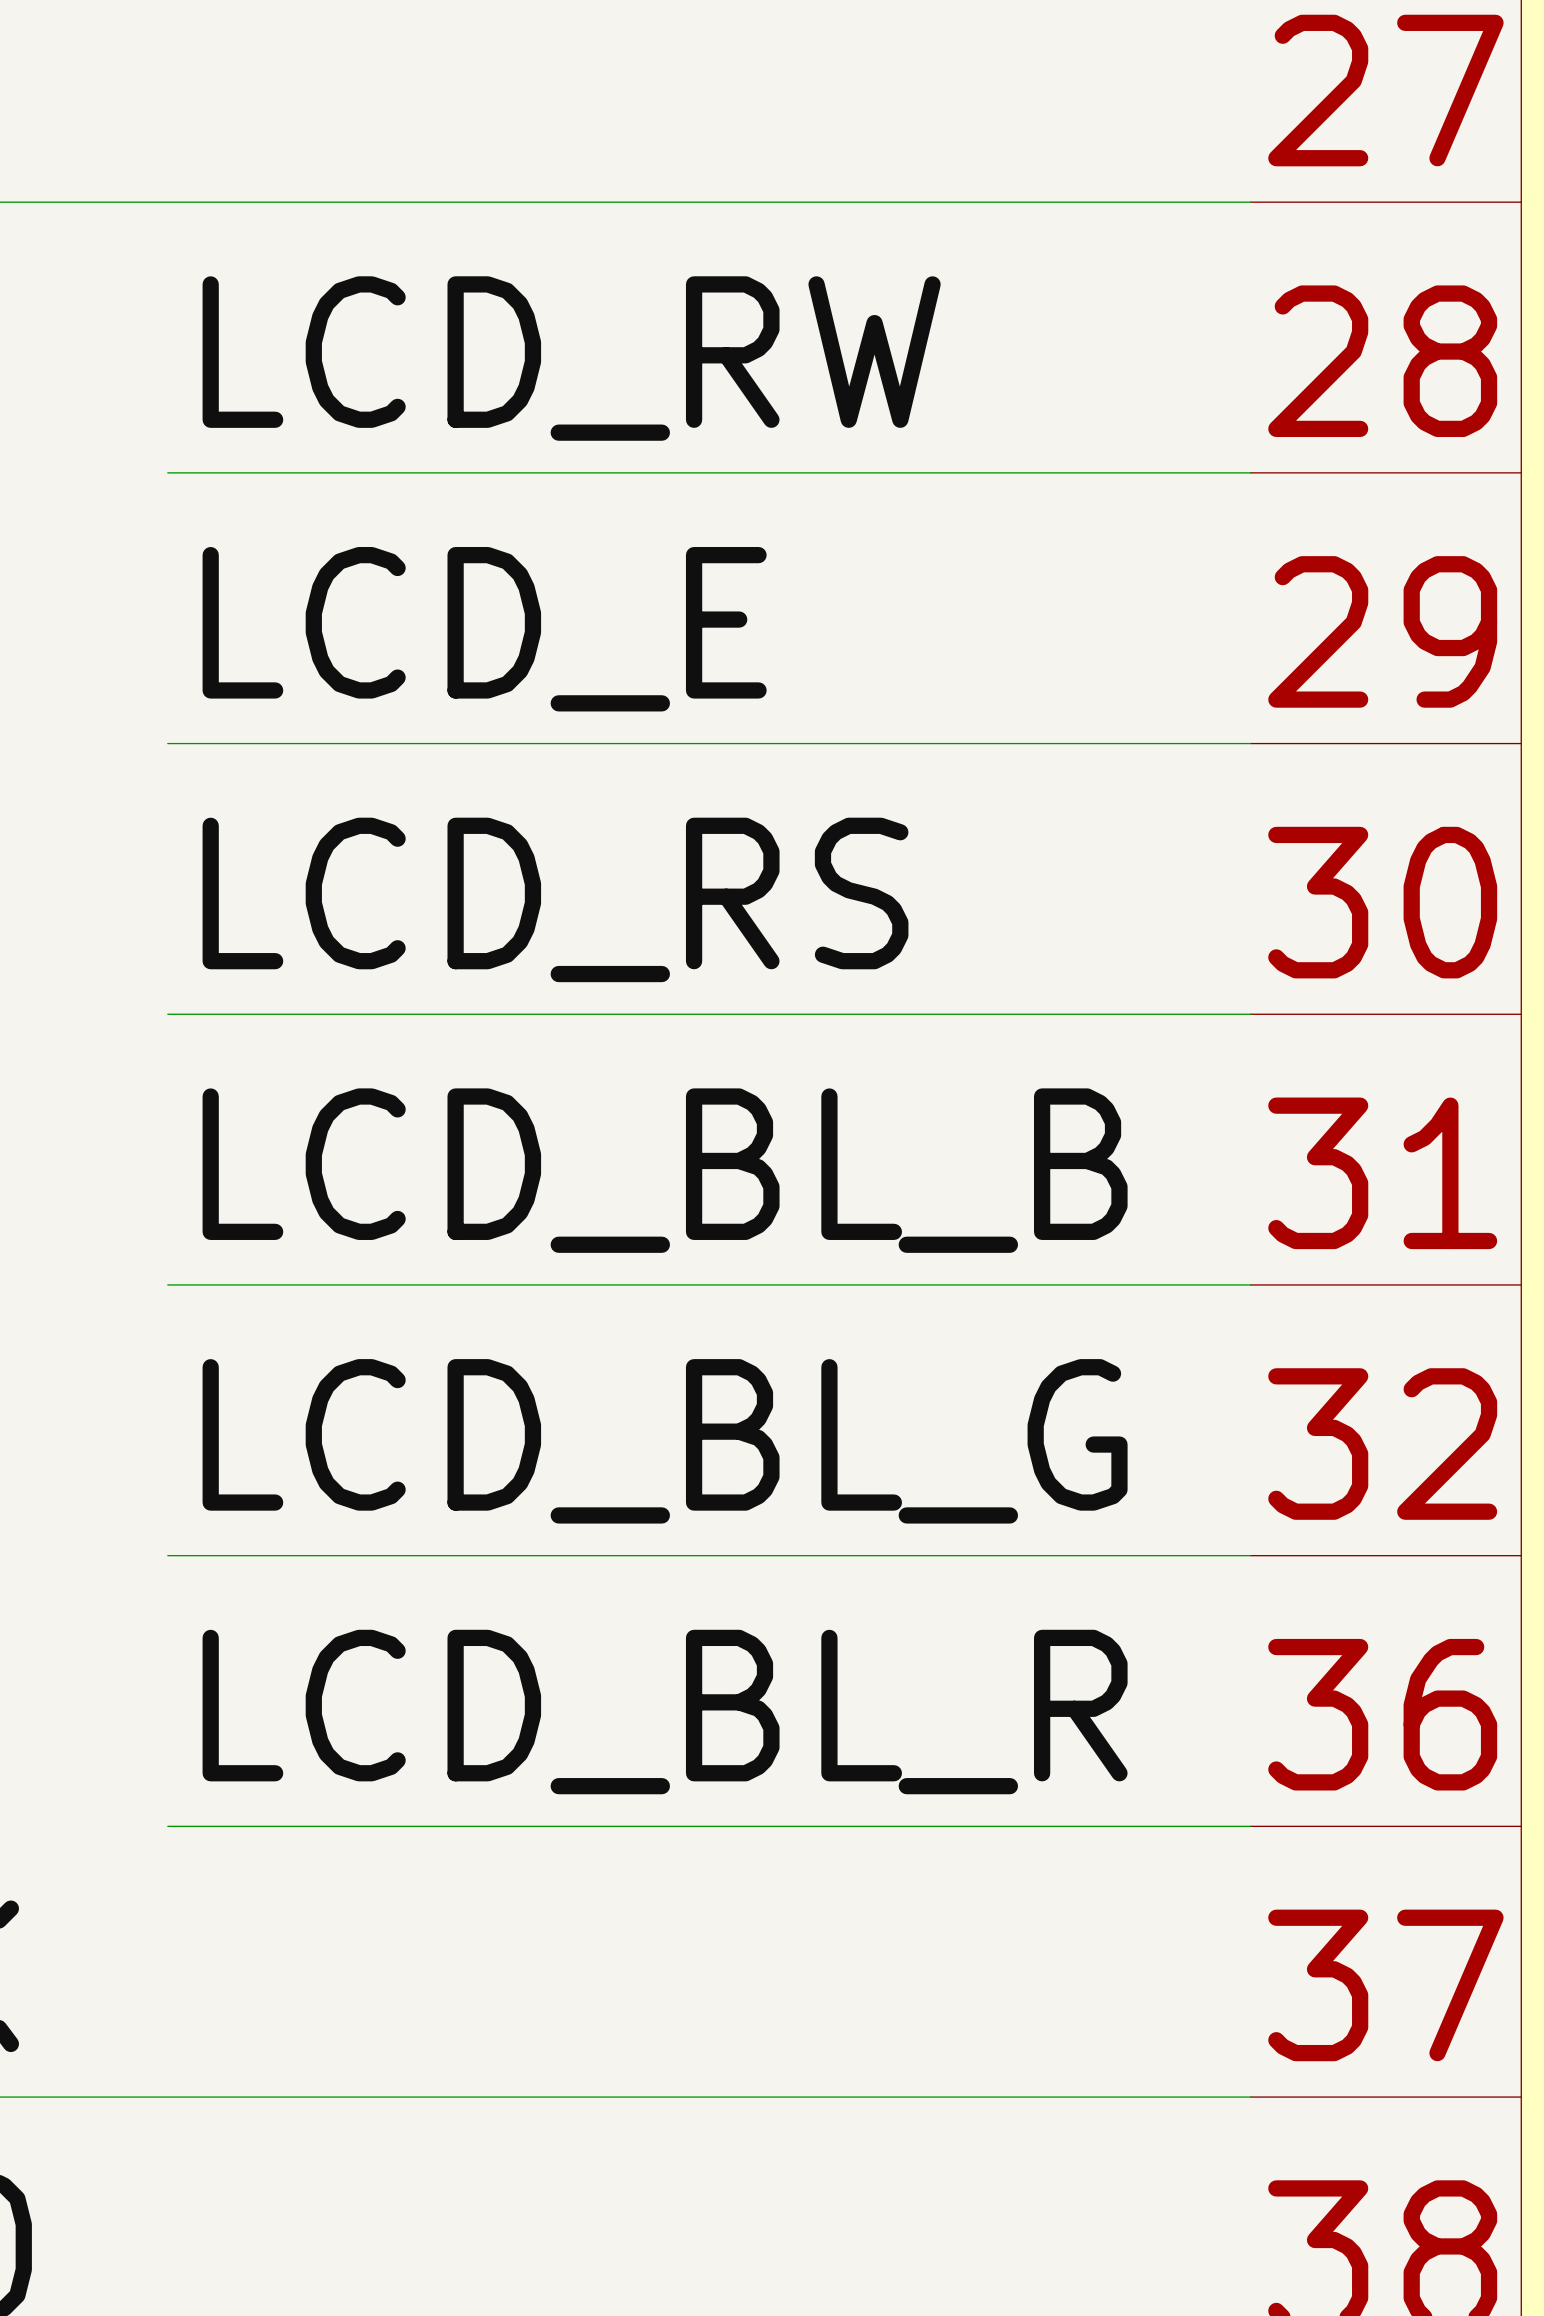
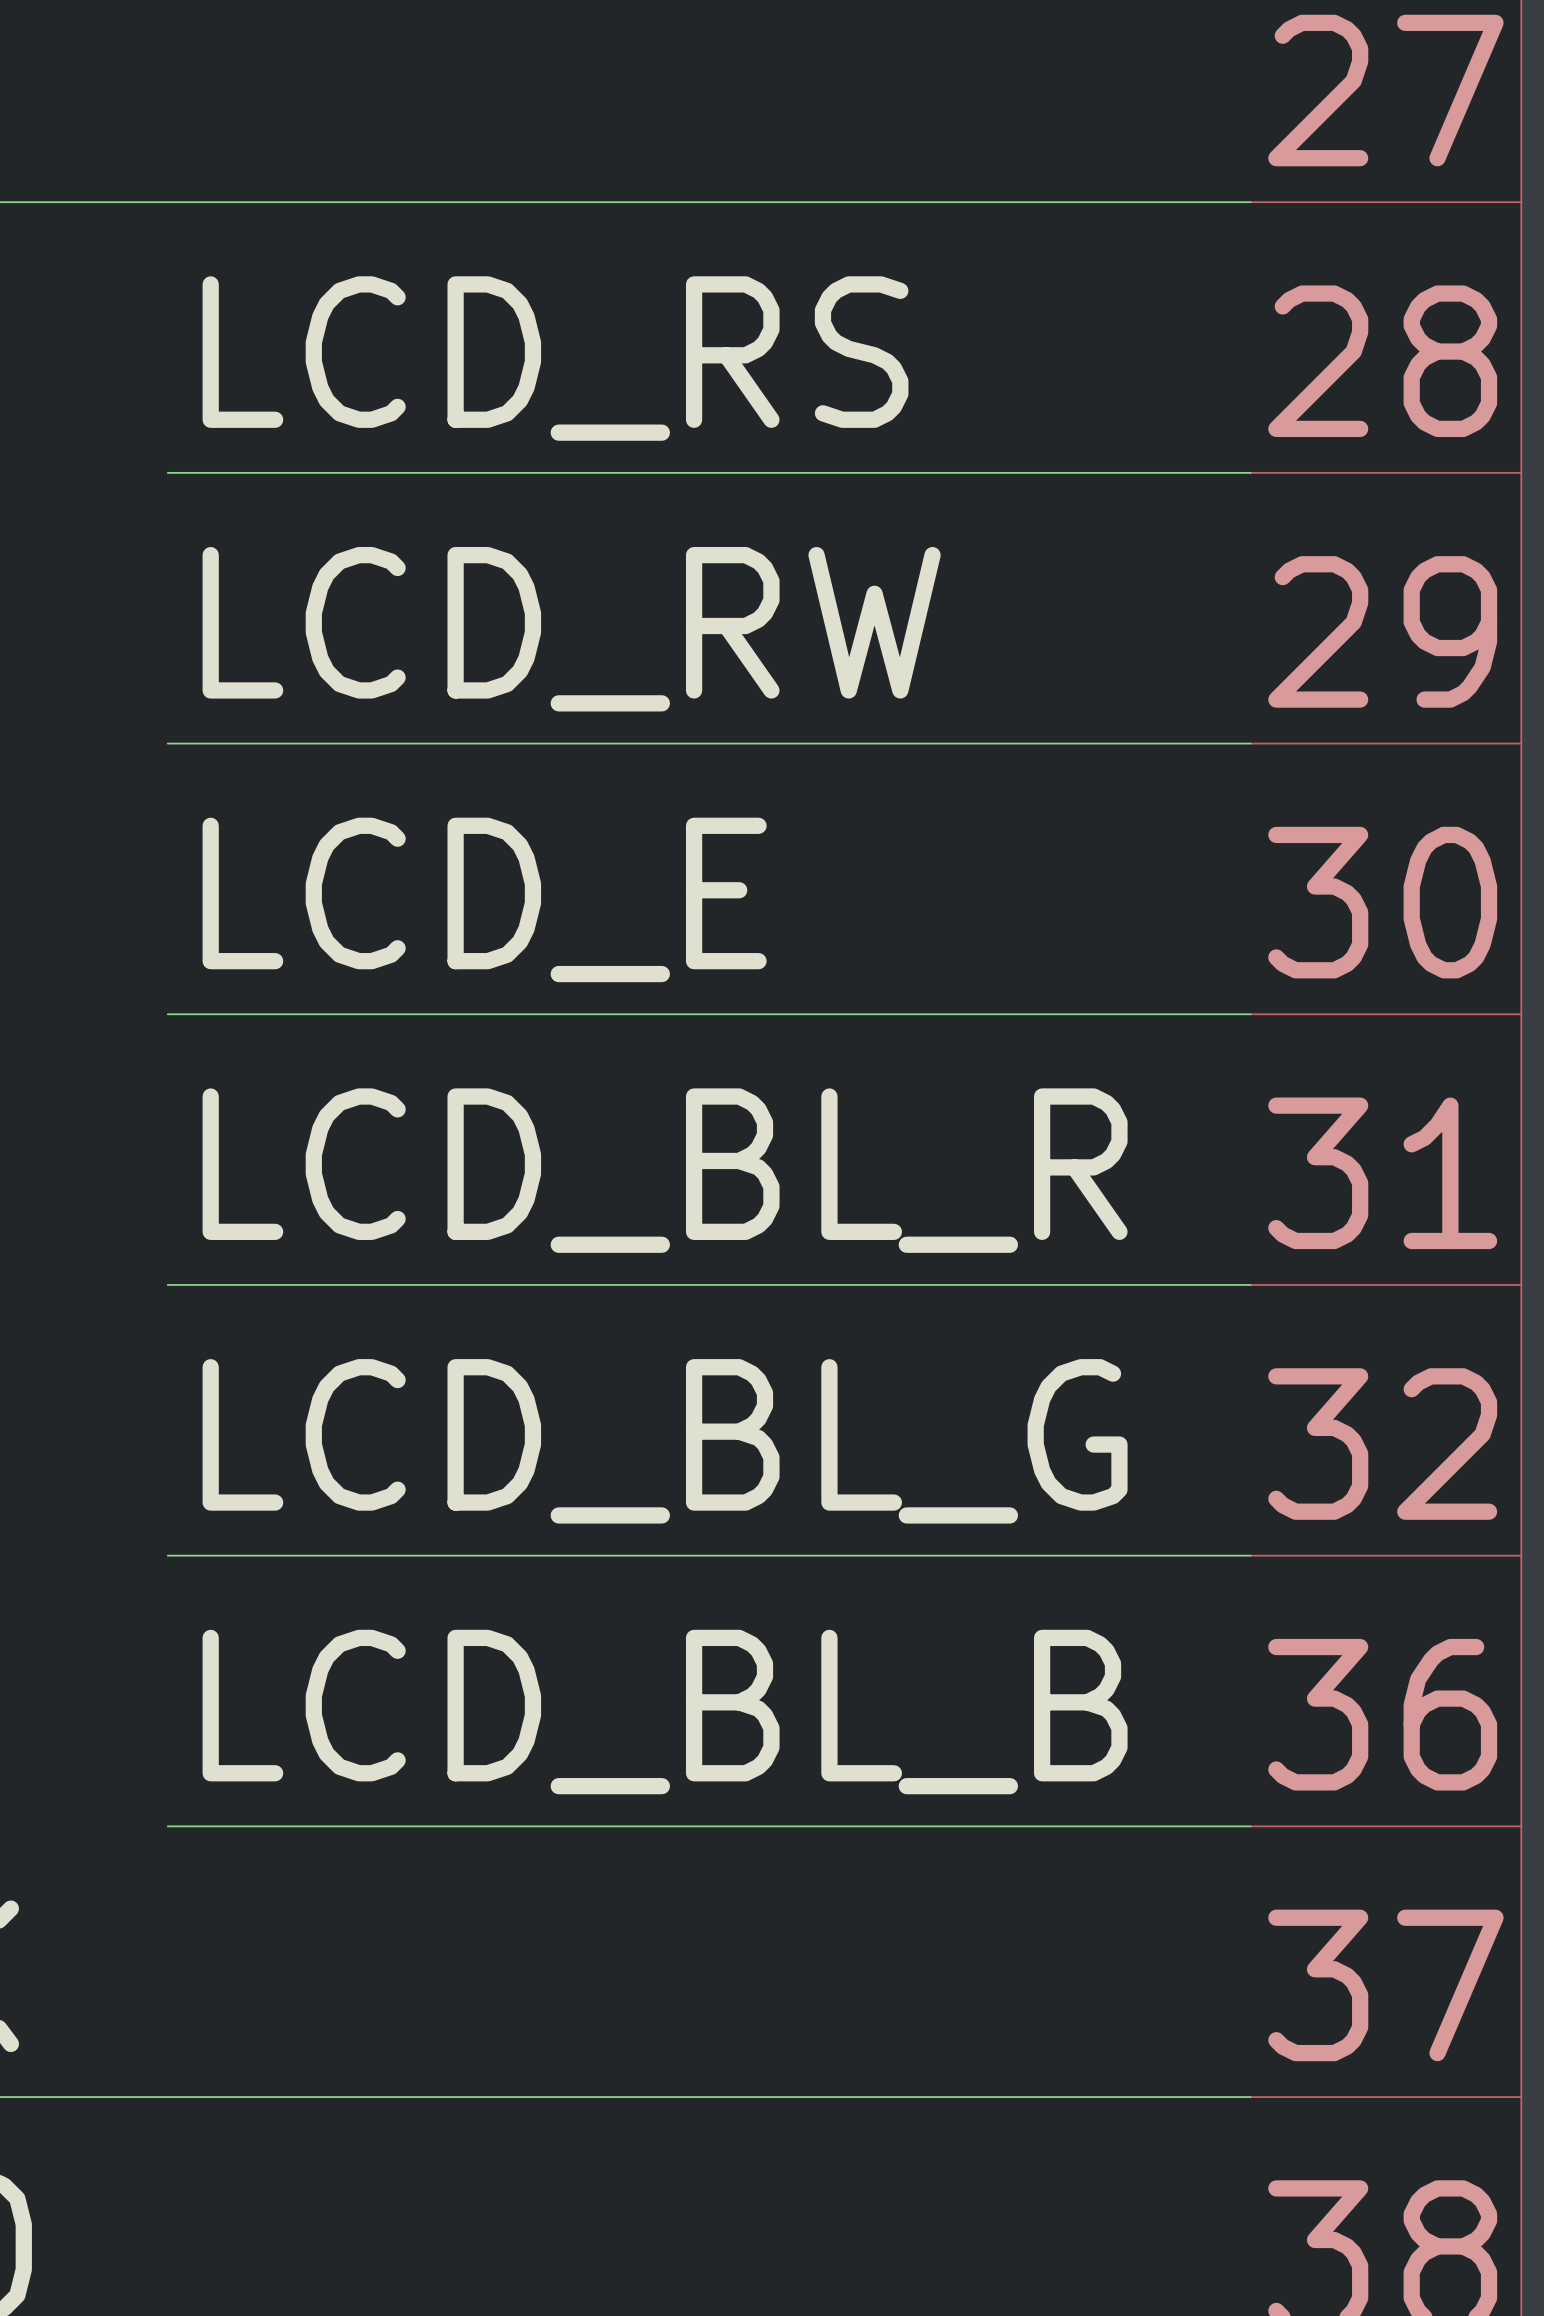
label: LCD_RW (571, 358) -> LCD_RS (555, 358)
label: LCD_E (484, 629) -> LCD_RW (571, 629)
label: LCD_RS (555, 899) -> LCD_E (484, 899)
label: LCD_BL_B (665, 1170) -> LCD_BL_R (665, 1170)
label: LCD_BL_R (665, 1712) -> LCD_BL_B (665, 1712)

